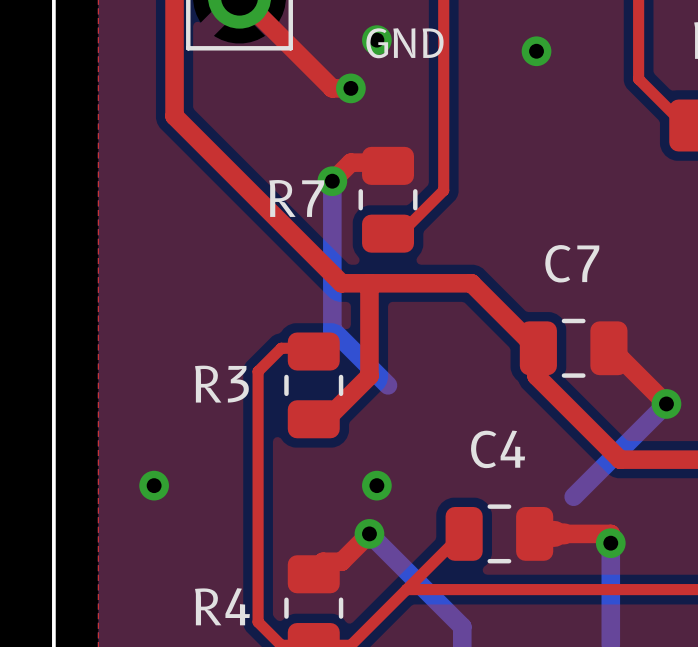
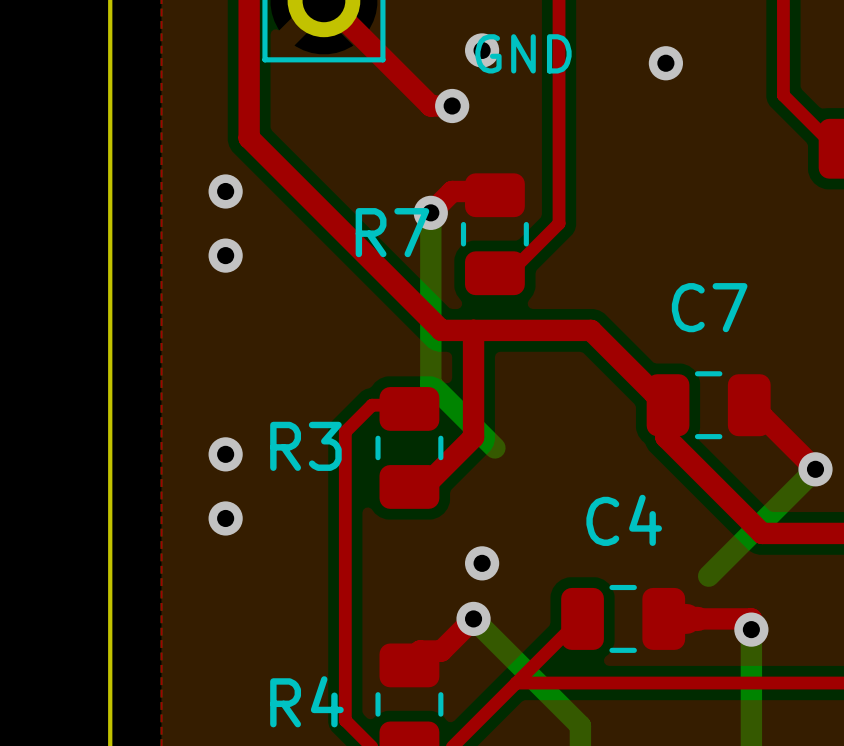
via: none -> (225, 191)
via: none -> (225, 255)
via: none -> (225, 454)
via position: (154, 485) -> (225, 518)

